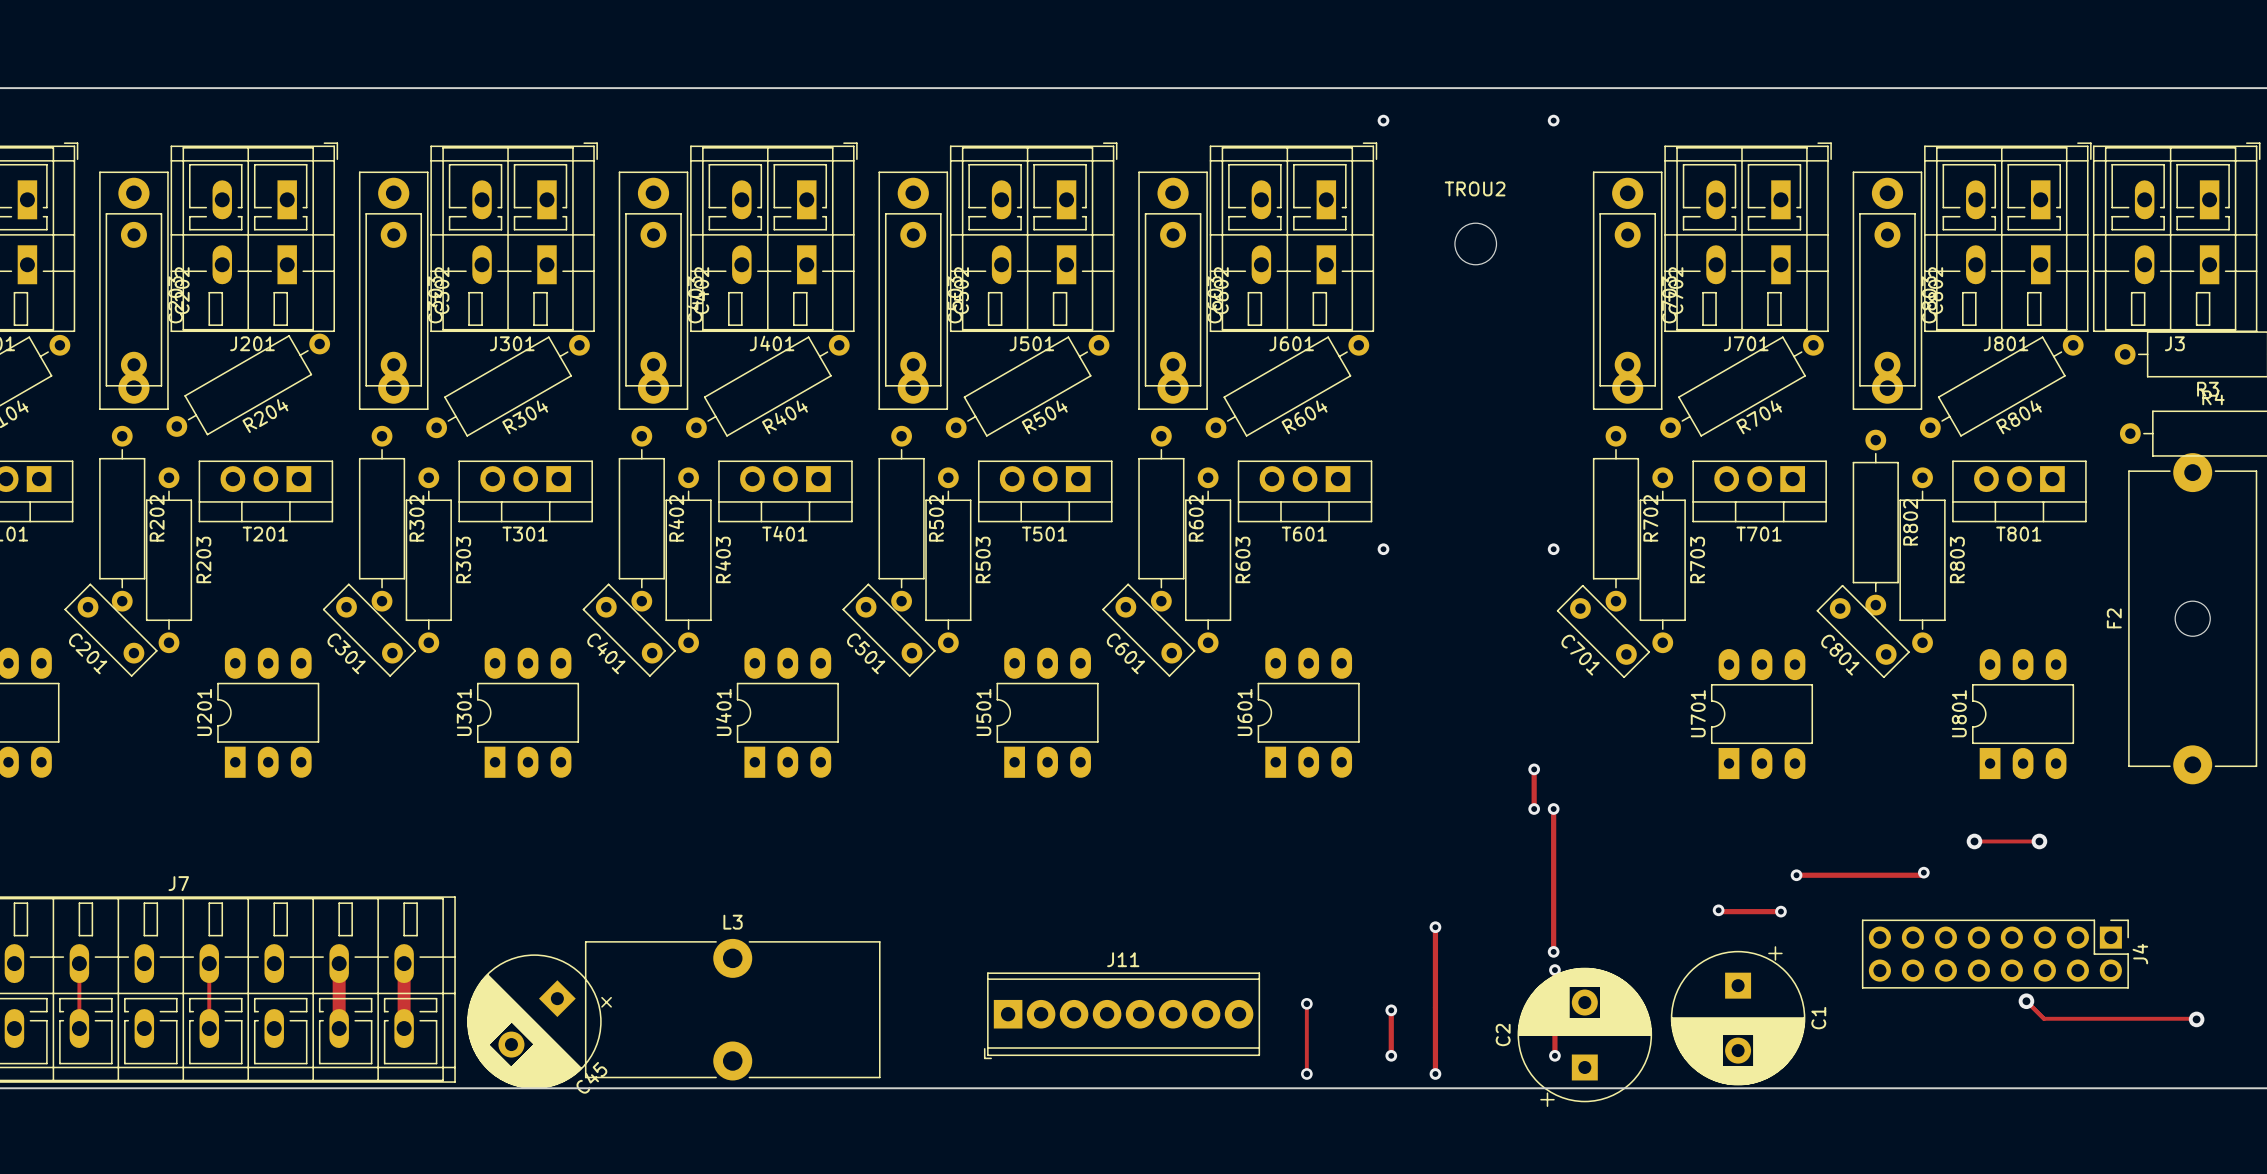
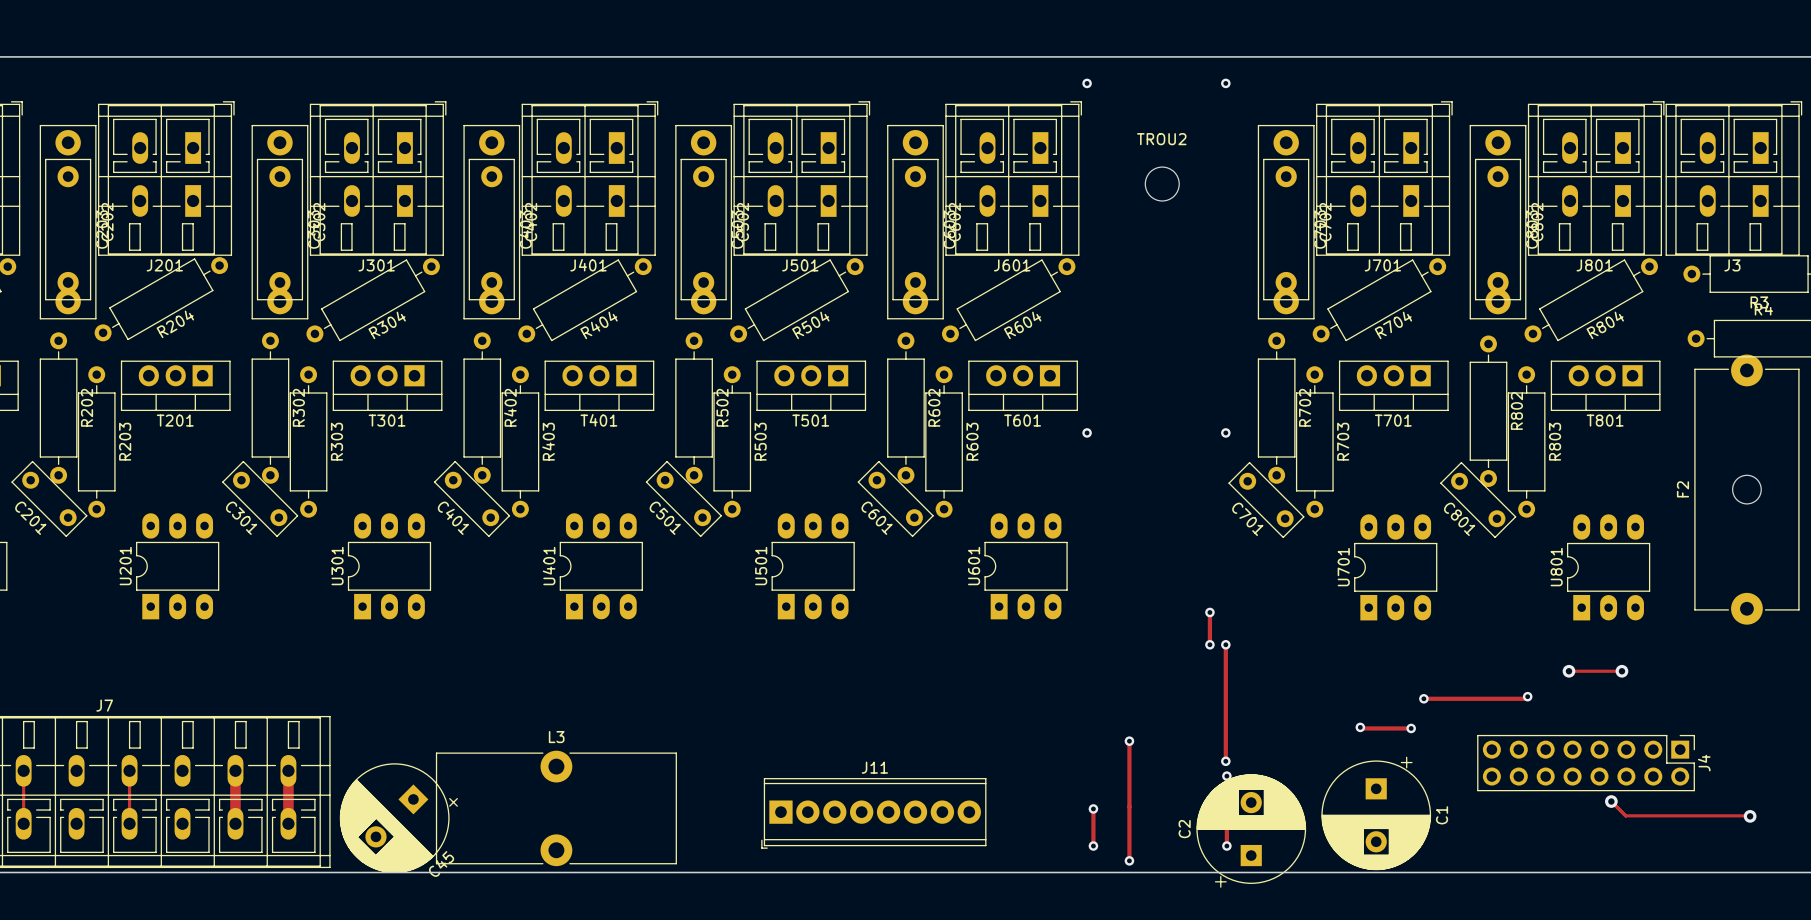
track: (1306, 1003) (1306, 1073) -> none
via: (1306, 1003) -> none
via: (1306, 1073) -> none

